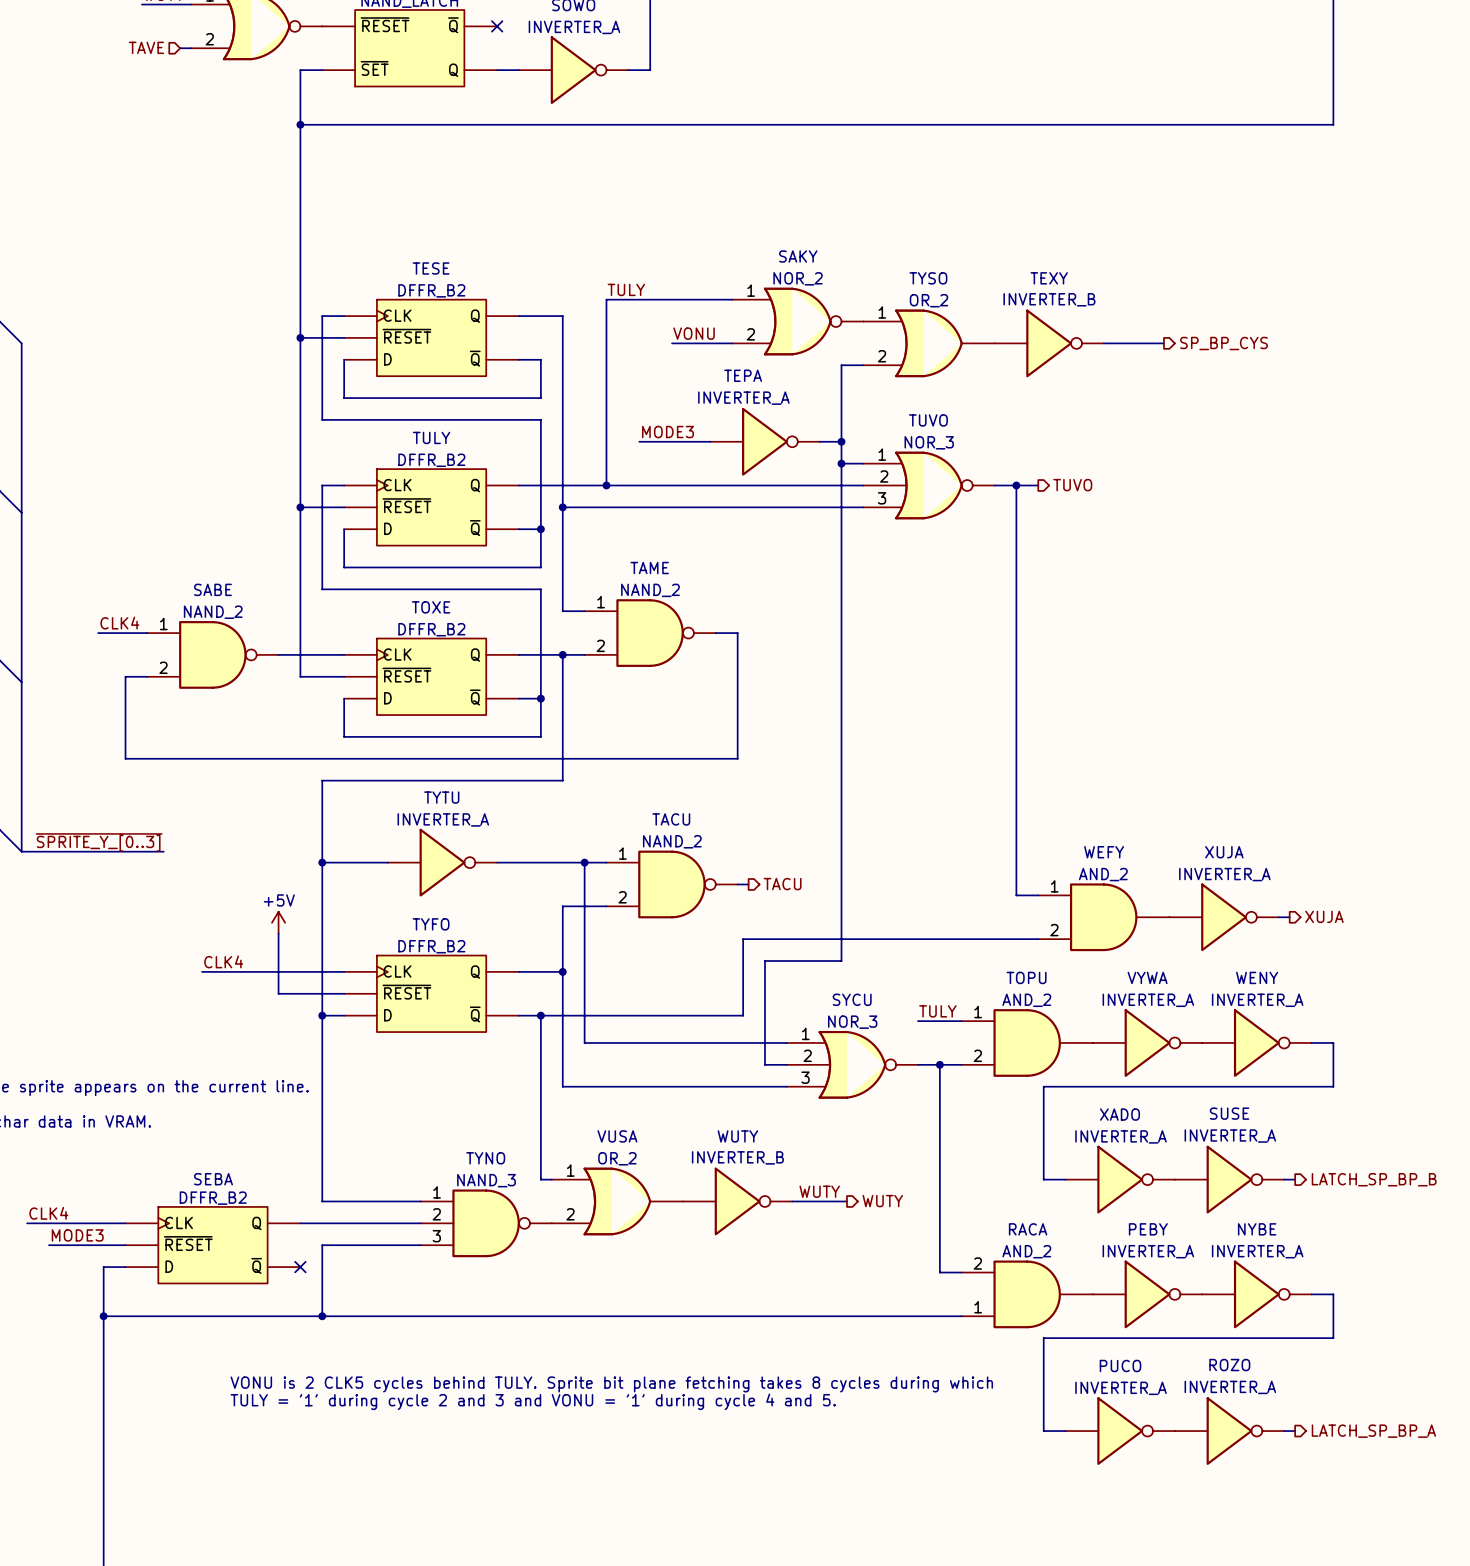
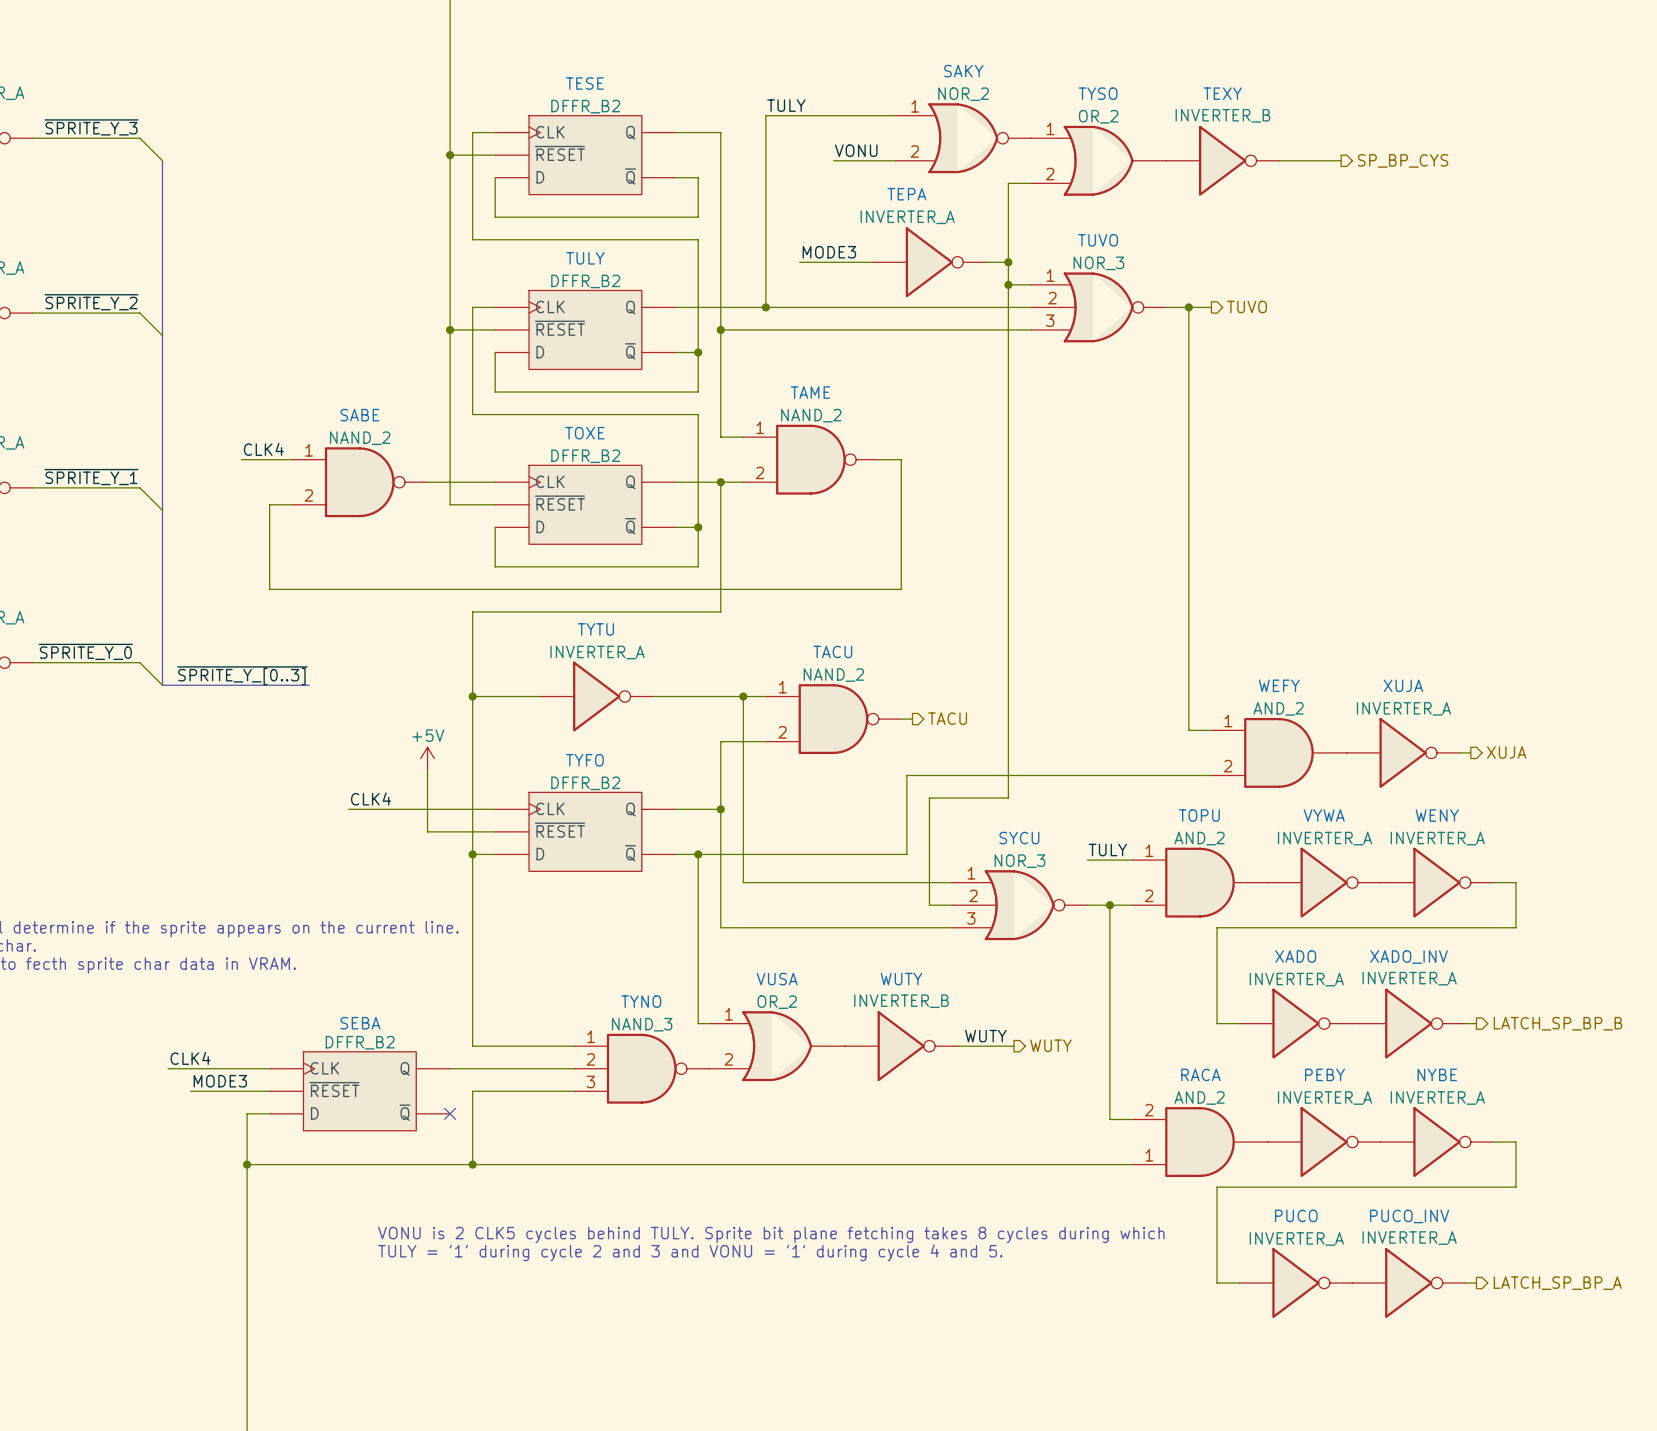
SUSE name: SUSE (1229, 1113) -> XADO_INV (1409, 957)
ROZO name: ROZO (1229, 1365) -> PUCO_INV (1409, 1216)

